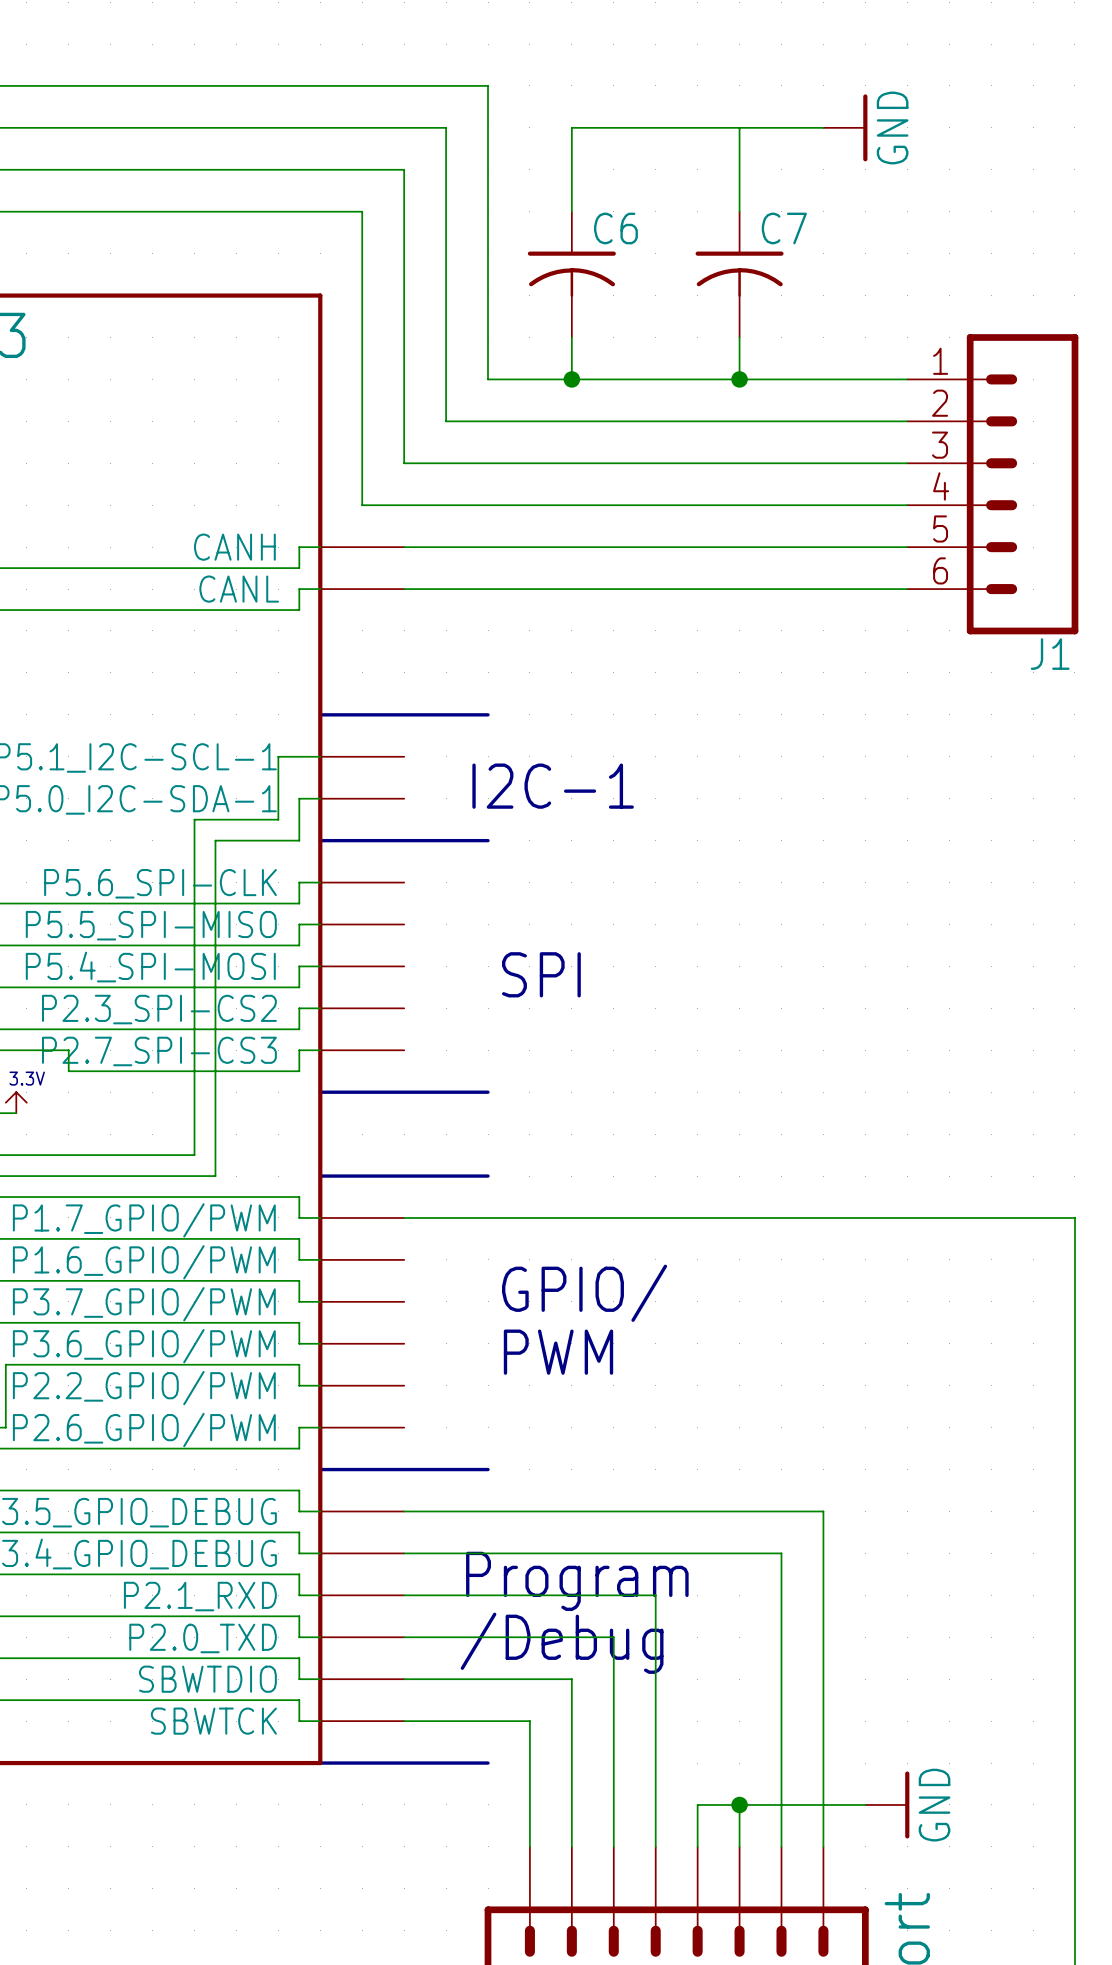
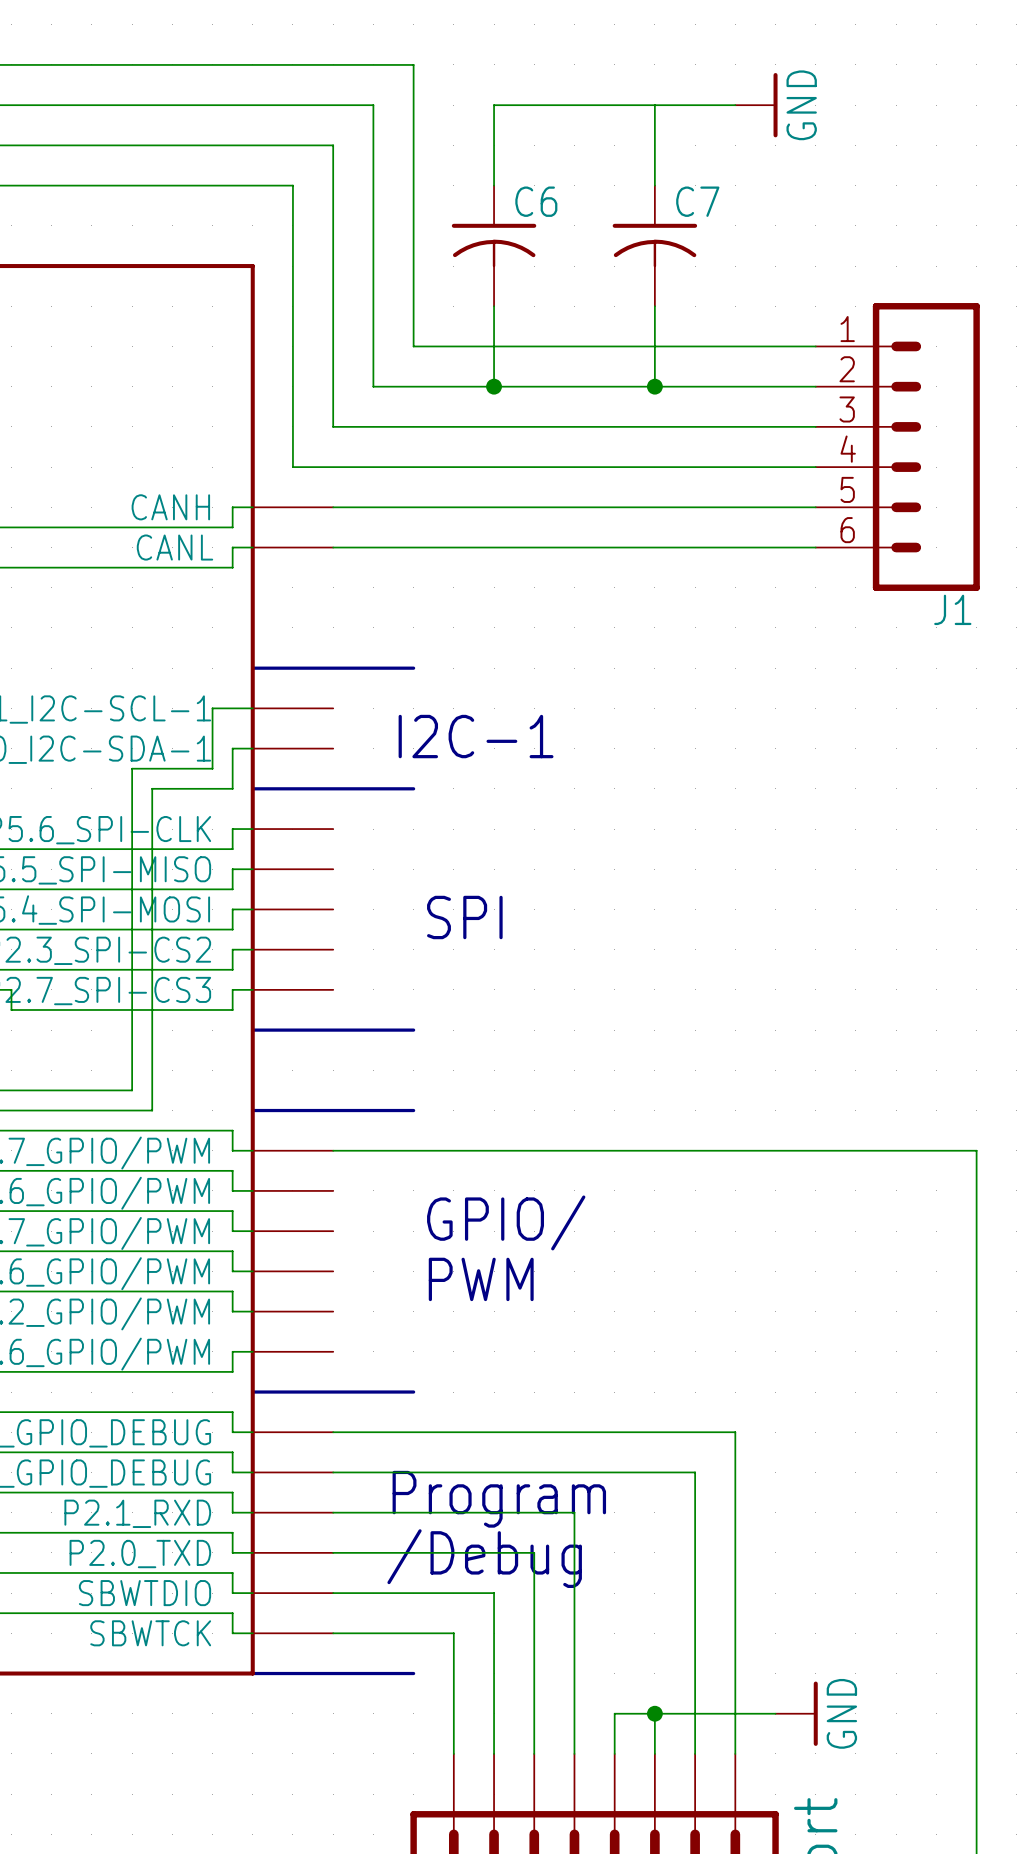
wire: none -> (494, 346) (494, 386)
junction position: (571, 379) -> (494, 386)
wire: none -> (654, 346) (654, 386)
junction position: (739, 379) -> (654, 386)

